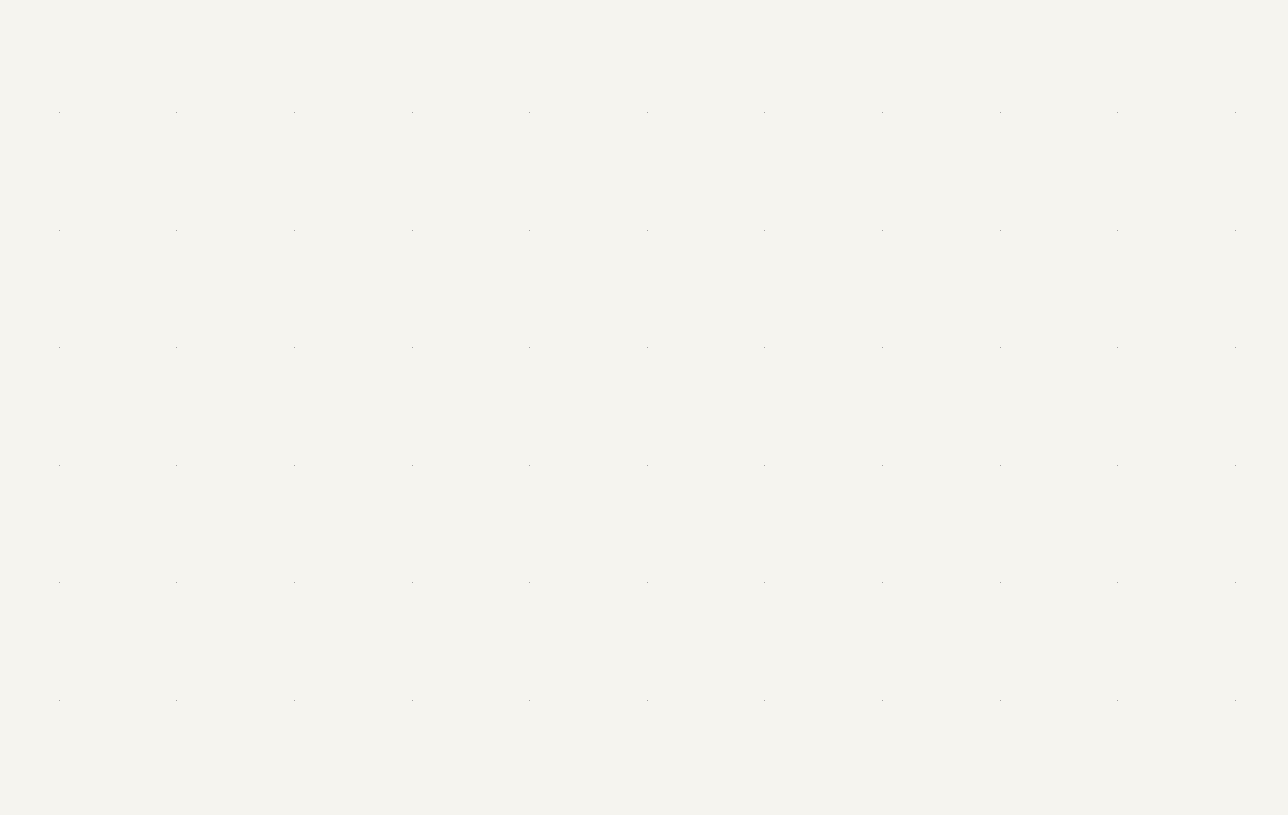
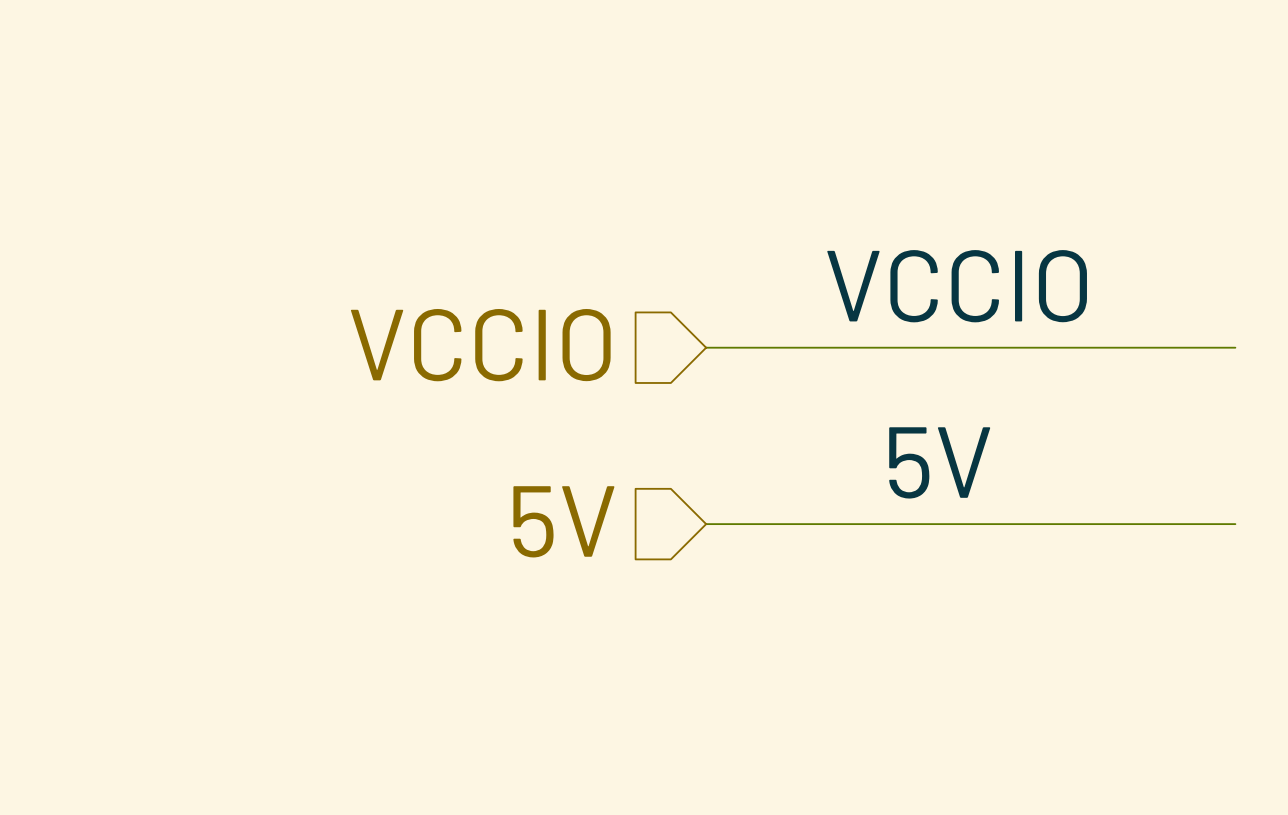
label: none -> VCCIO (957, 286)
hierarchical label: none -> VCCIO (480, 345)
wire: none -> (706, 347) (1235, 347)
label: none -> 5V (939, 462)
hierarchical label: none -> 5V (564, 521)
wire: none -> (706, 524) (1235, 524)

